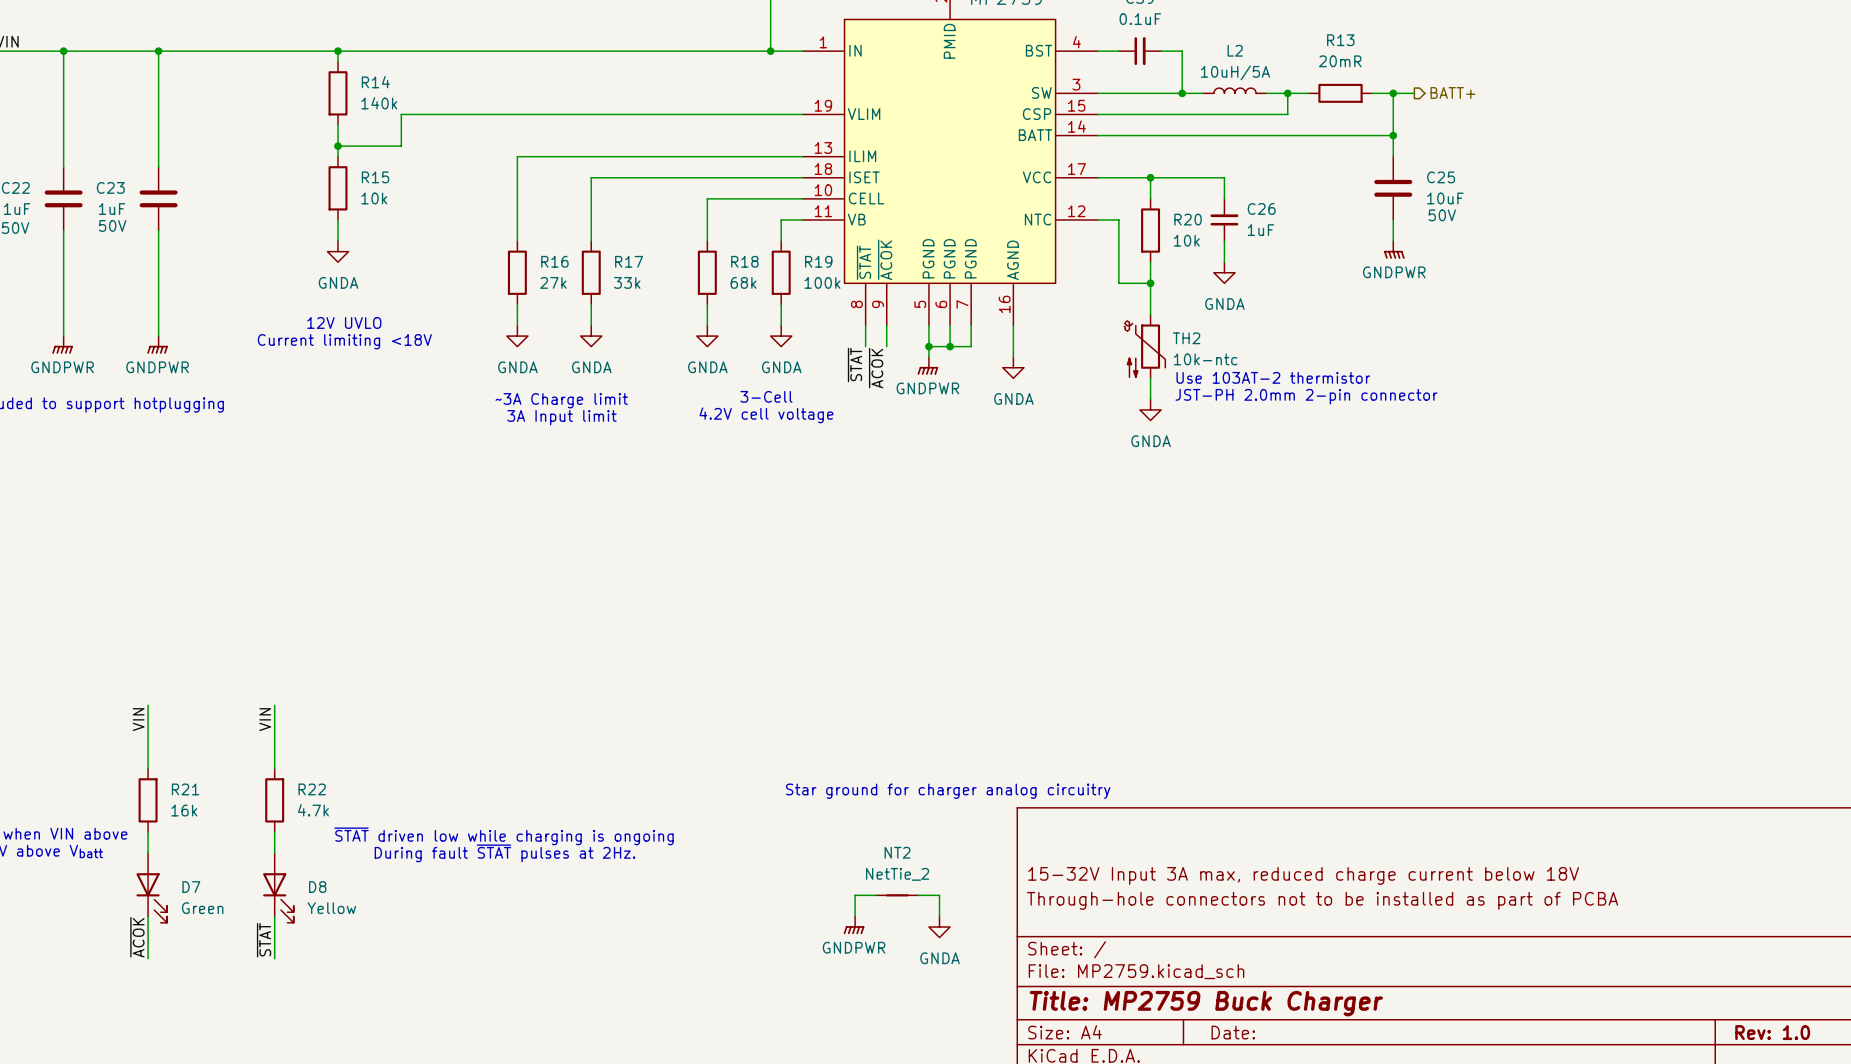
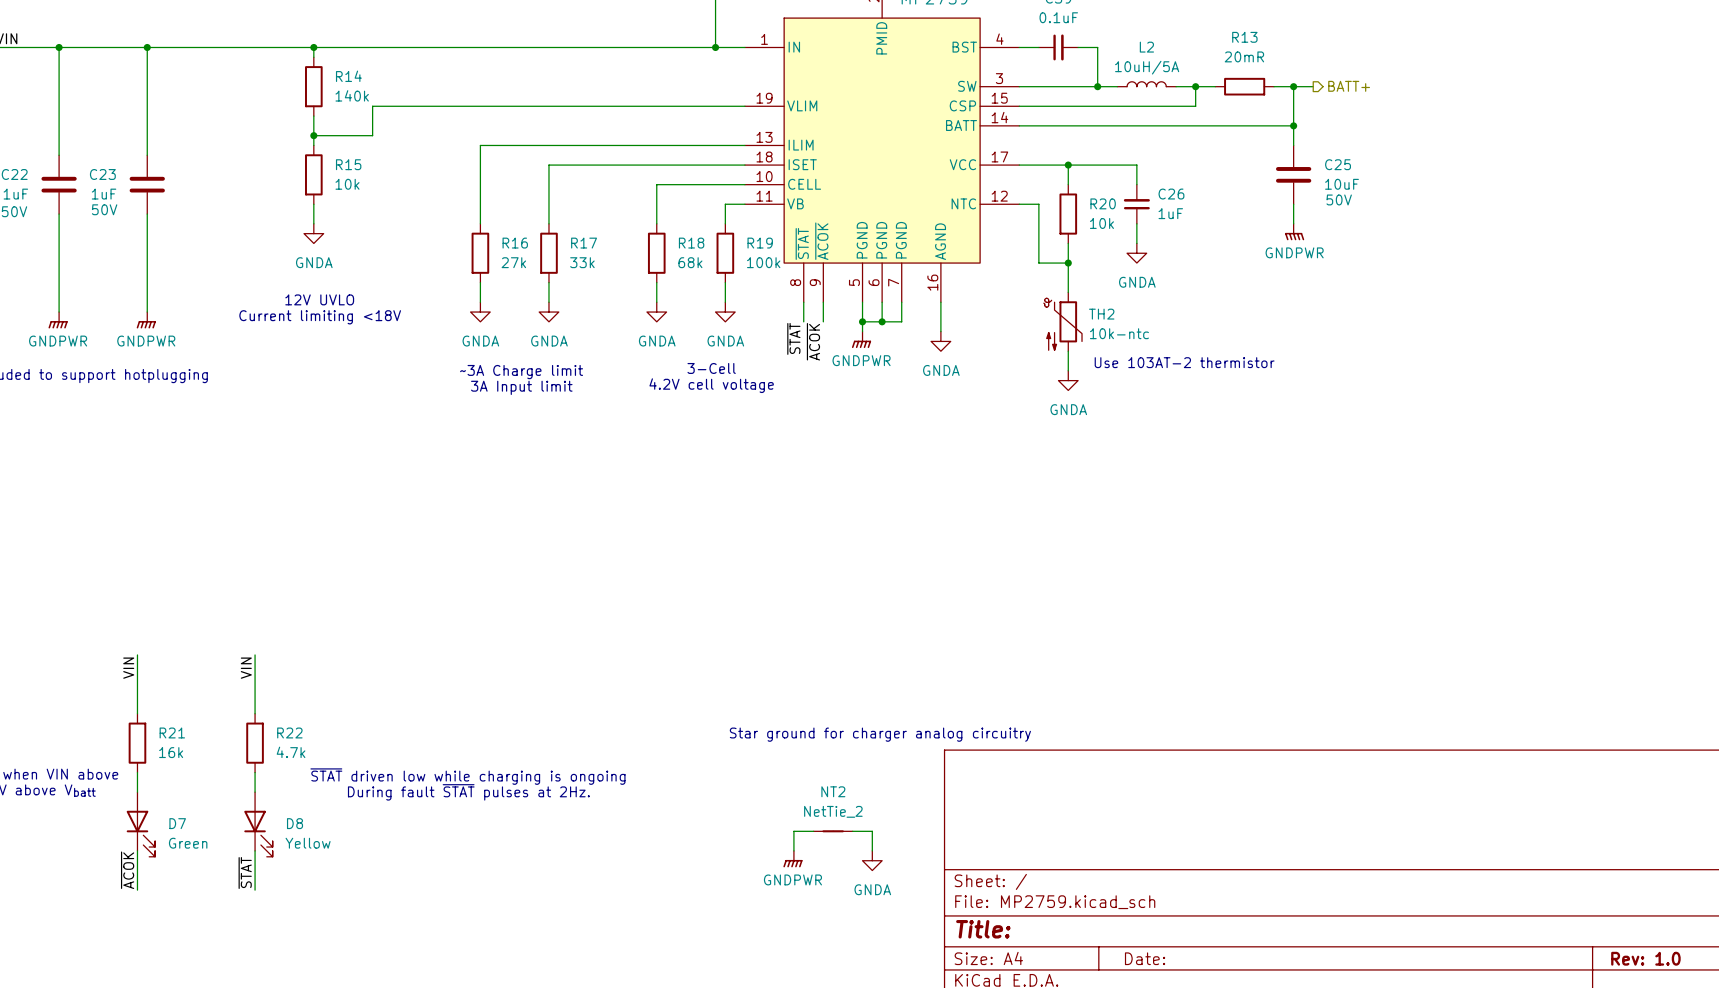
text position: Use 103AT-2 thermistor (1273, 377) -> Use 103AT-2 thermistor (1184, 362)
text: JST-PH 2.0mm 2-pin connector (1306, 396) -> none
title block: 15-32V Input 3A max, reduced charge current below 18V (1303, 875) -> none
title block: Through-hole connectors not to be installed as part of PCBA (1322, 900) -> none
title block: Title: MP2759 Buck Charger (1206, 1003) -> Title: (983, 929)

